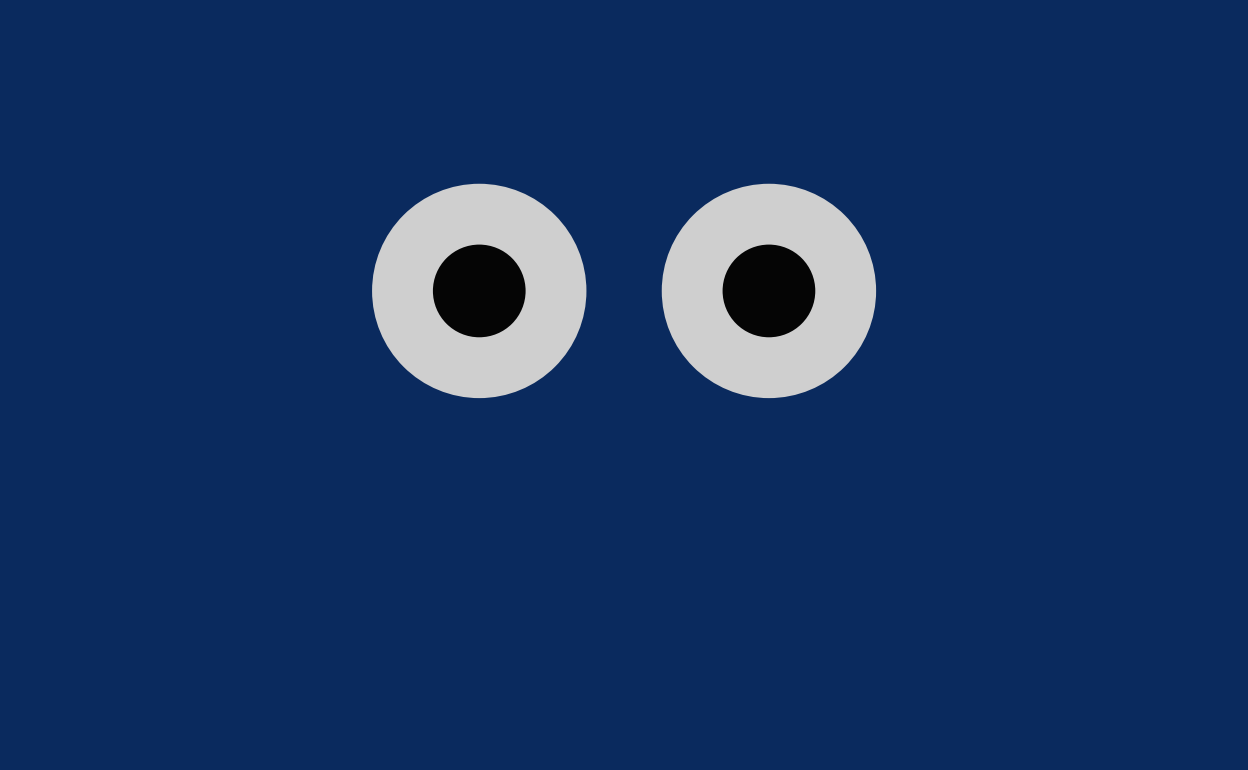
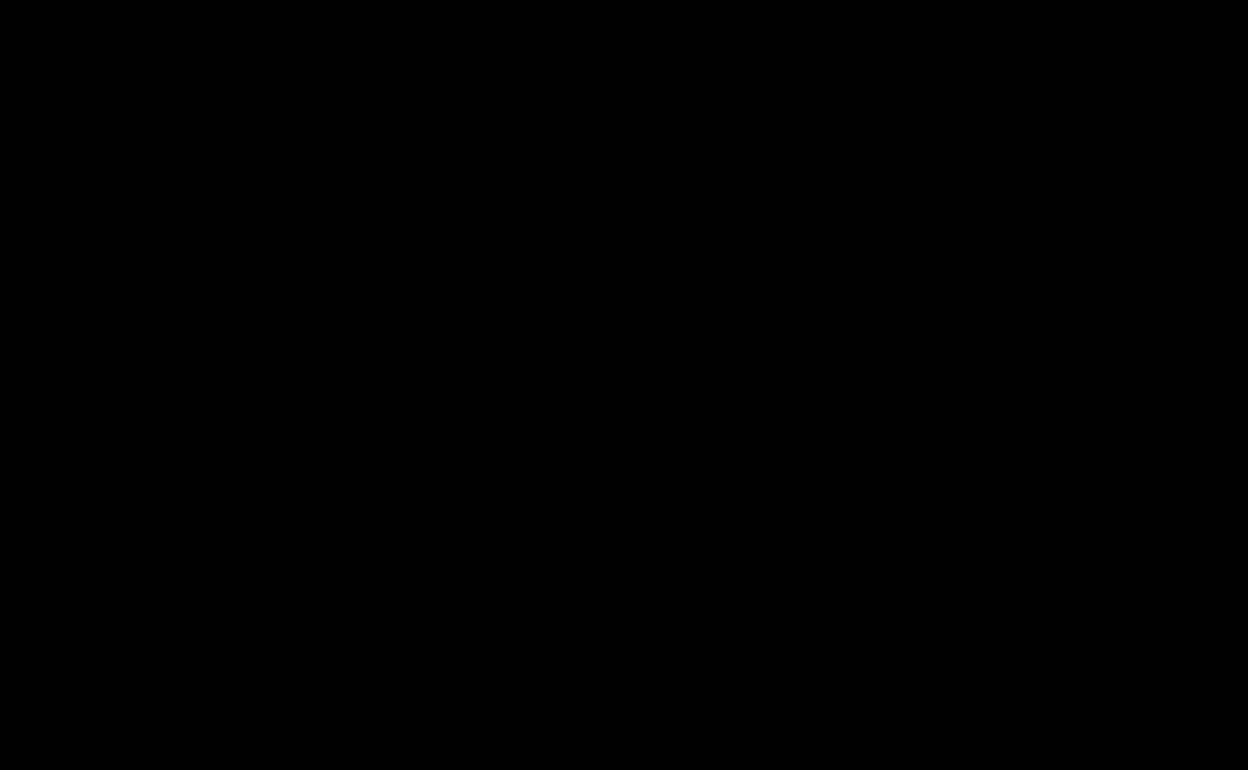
part: (624, 290) -> none

